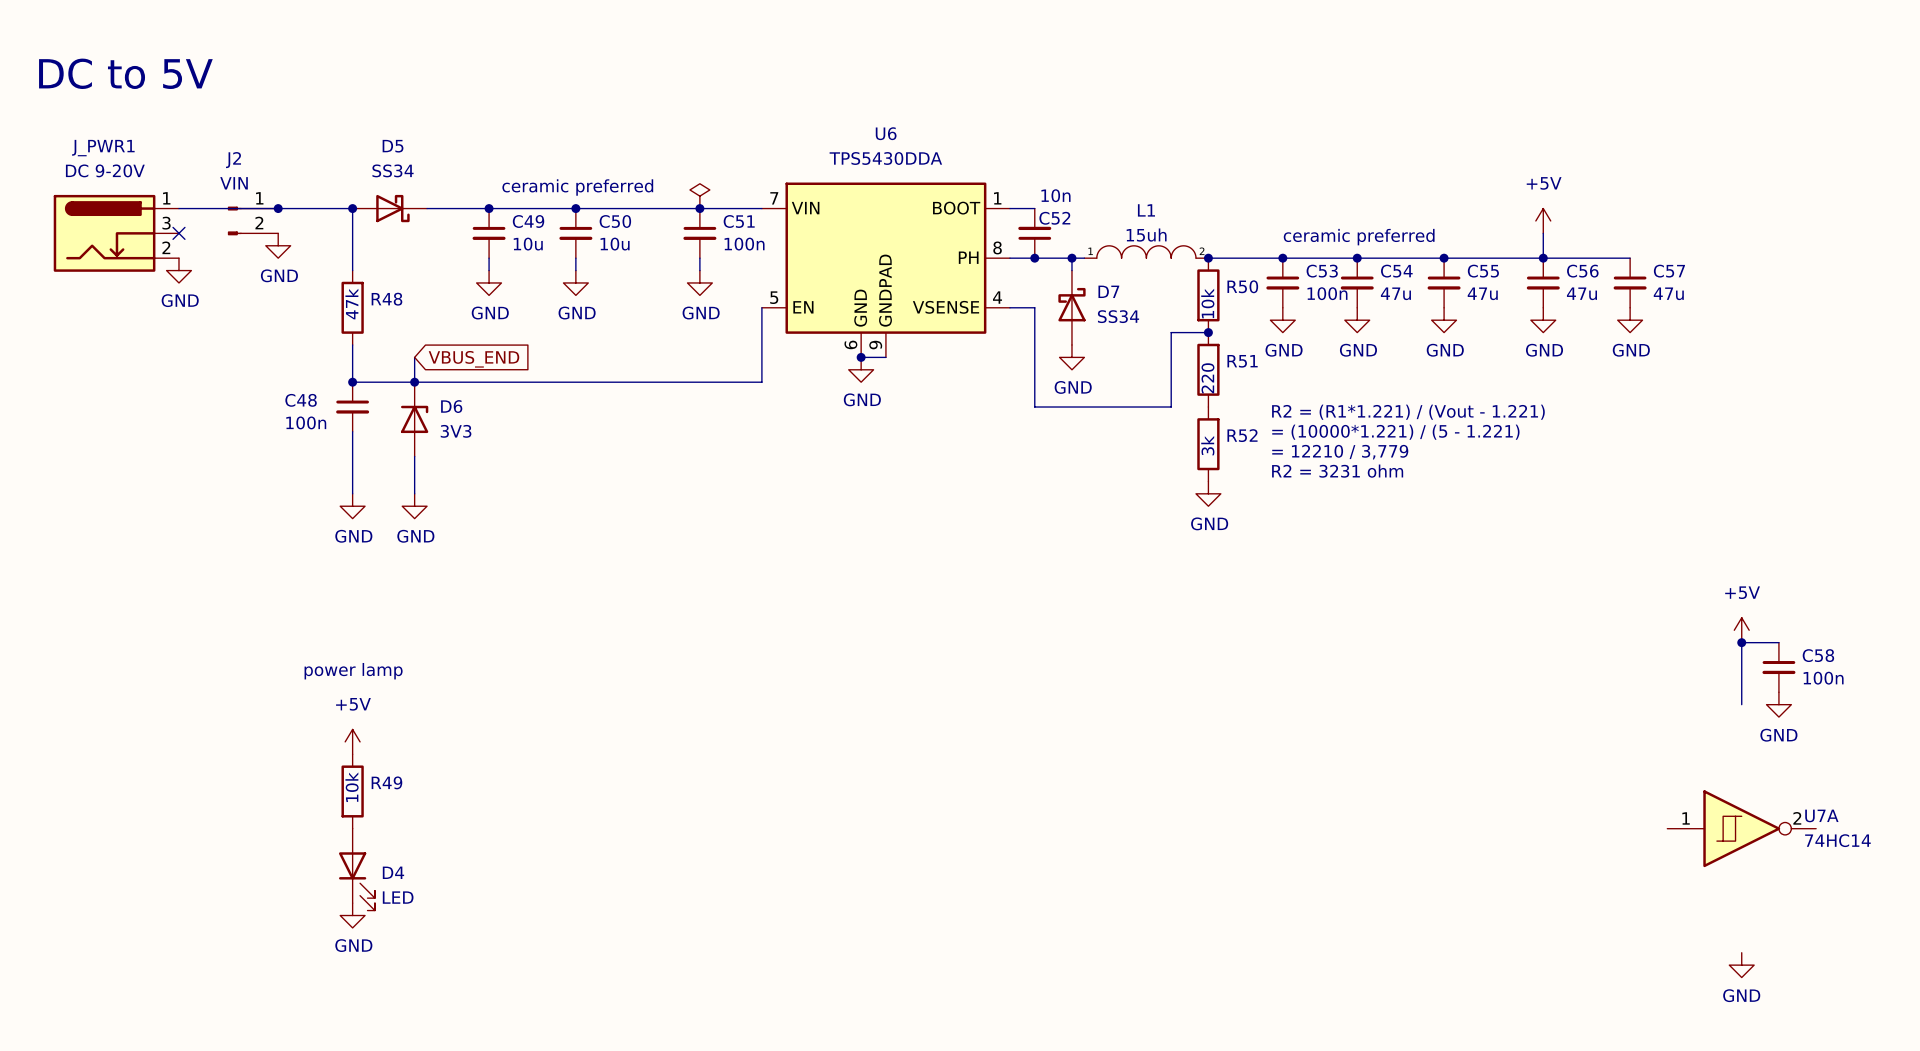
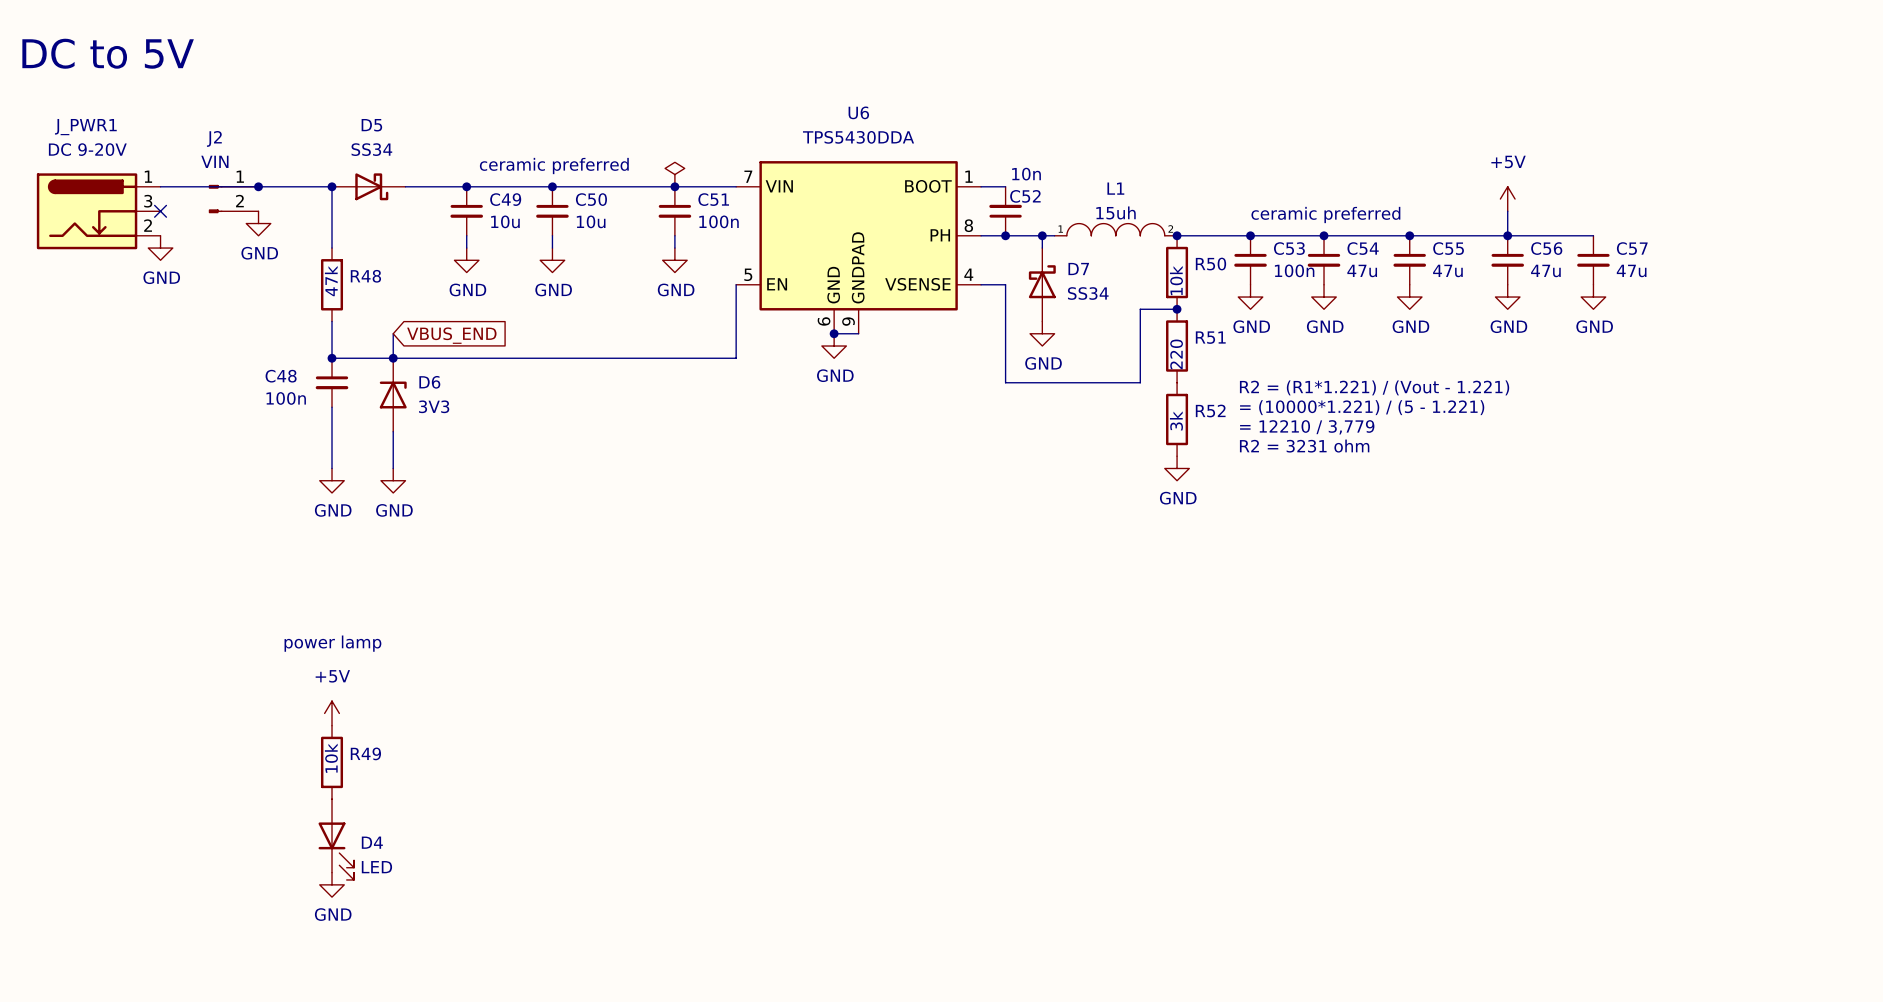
power symbol: +5V (1741, 630) -> none
junction: (1741, 642) -> none
wire: (1778, 642) (1741, 642) (1741, 704) -> none
C58: 100n (1778, 667) -> none
power symbol: GND (1778, 704) -> none
U7A: 74HC14 (1741, 828) -> none
power symbol: GND (1741, 965) -> none

